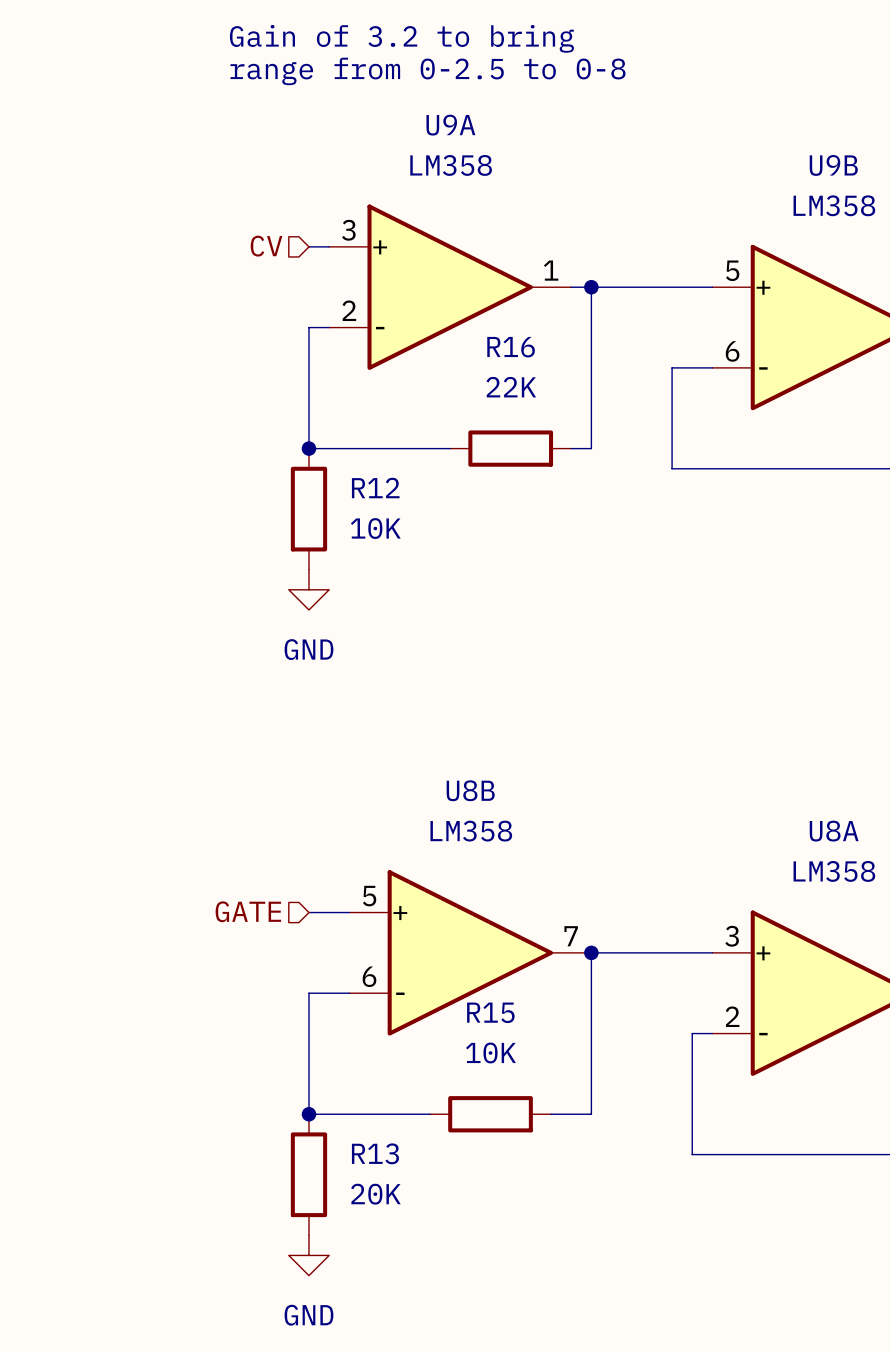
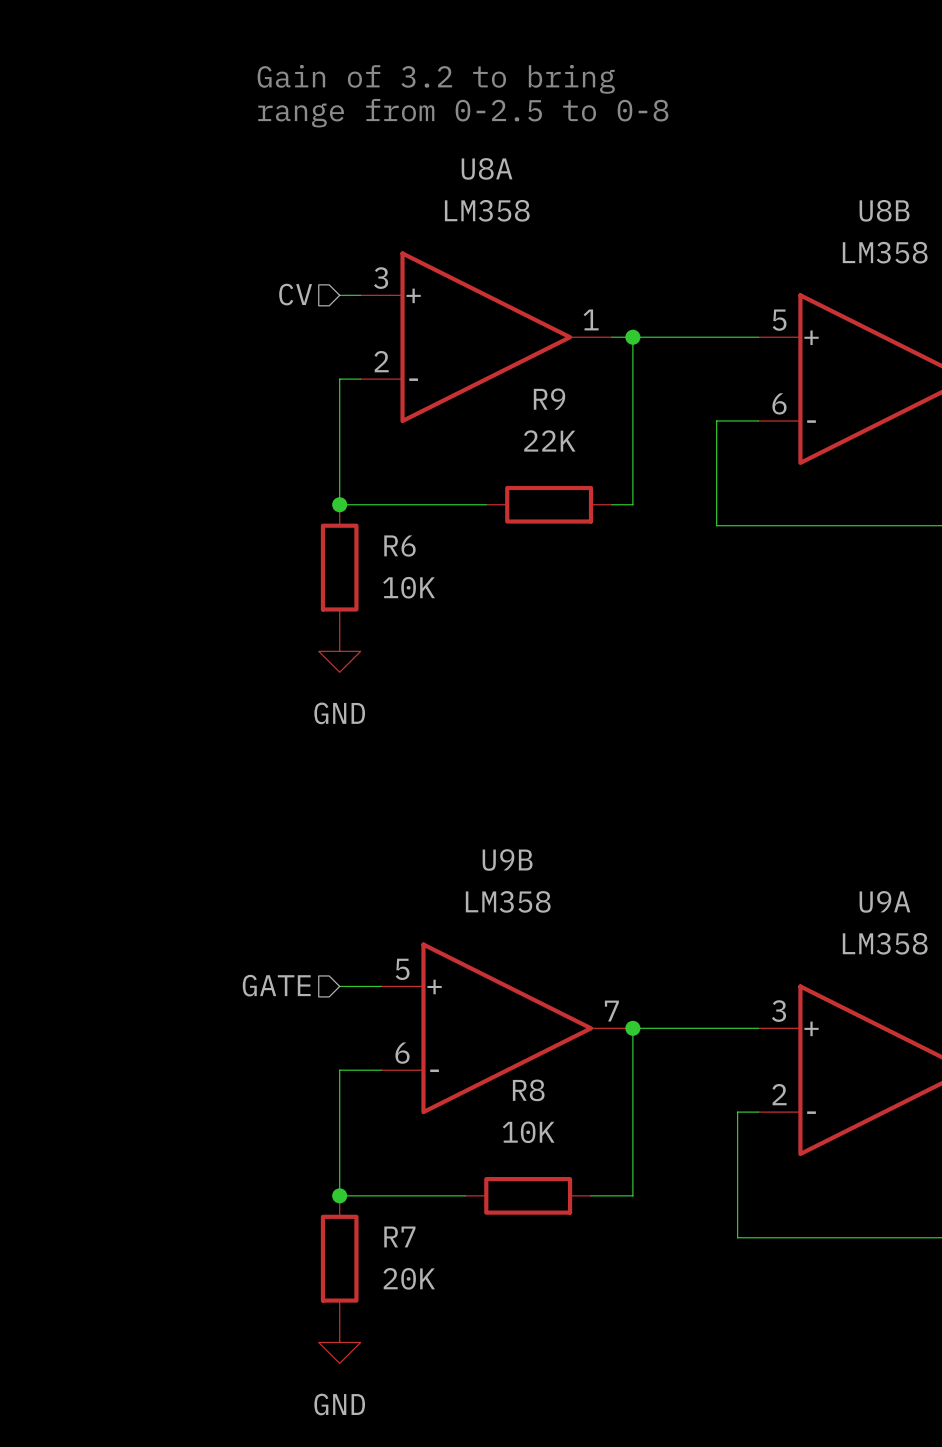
U9A name: U9A (450, 125) -> U8A (487, 168)
U9B name: U9B (833, 165) -> U8B (884, 210)
R16 name: R16 (511, 347) -> R9 (549, 399)
R12 name: R12 (375, 488) -> R6 (399, 546)
U8B name: U8B (470, 790) -> U9B (507, 860)
U8A name: U8A (834, 831) -> U9A (884, 901)
R15 name: R15 (490, 1012) -> R8 (528, 1090)
R13 name: R13 (375, 1153) -> R7 (399, 1236)

